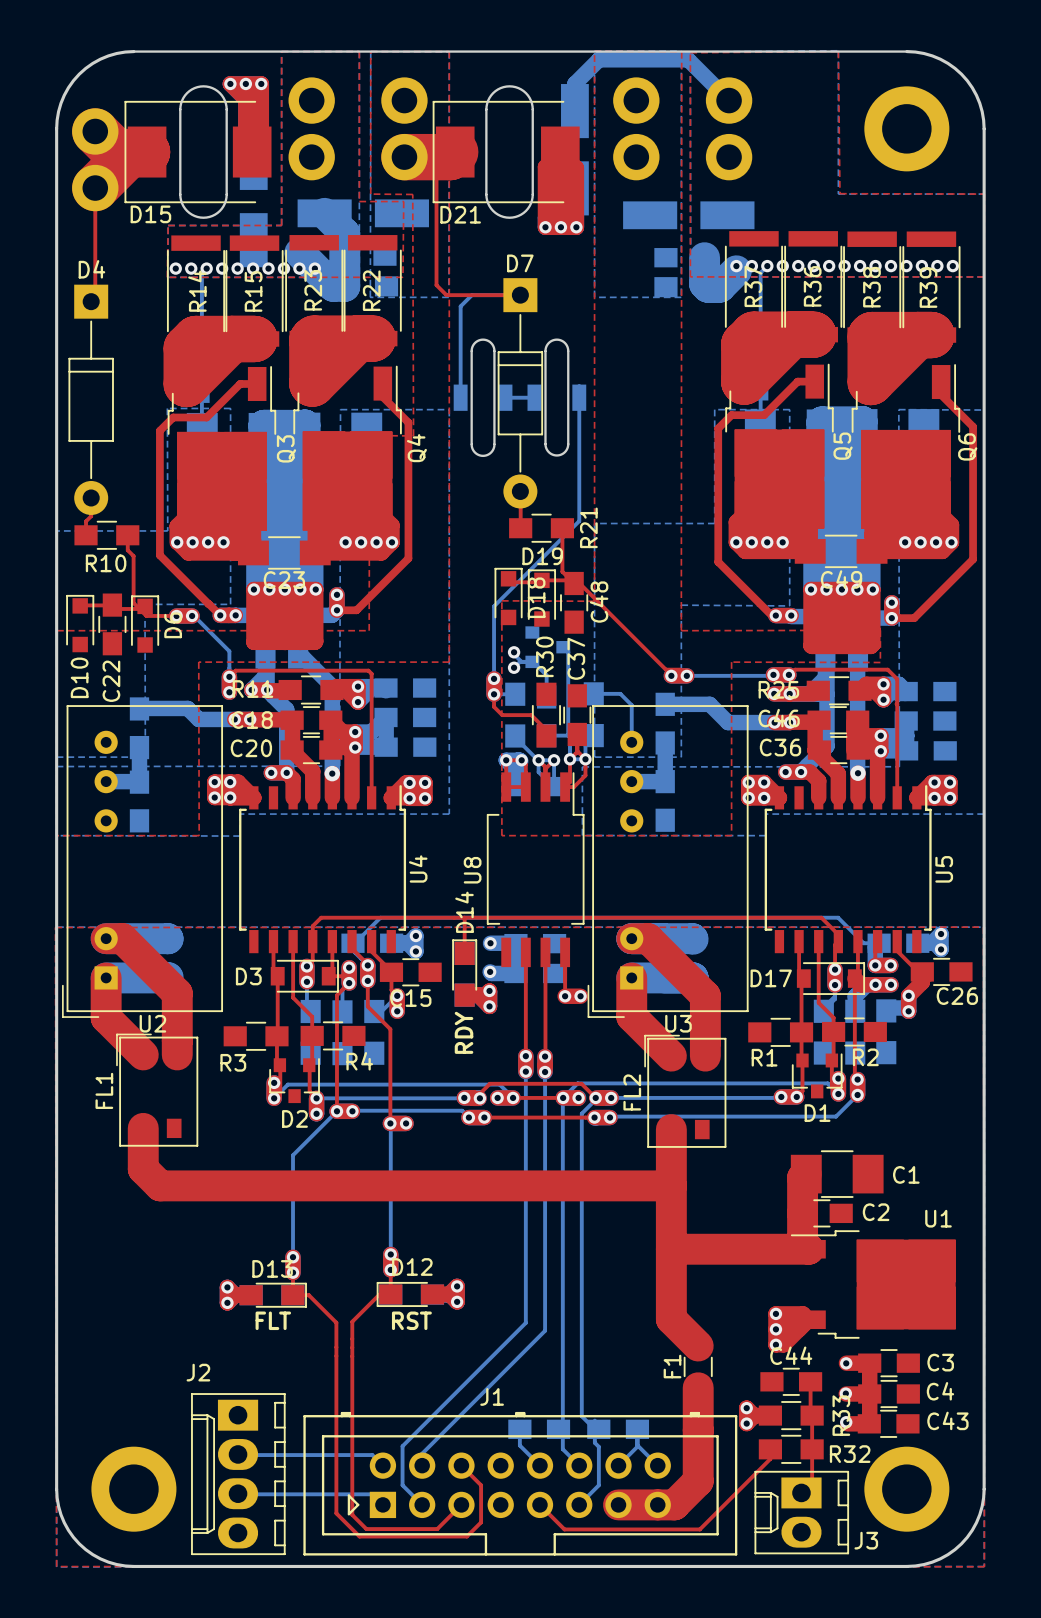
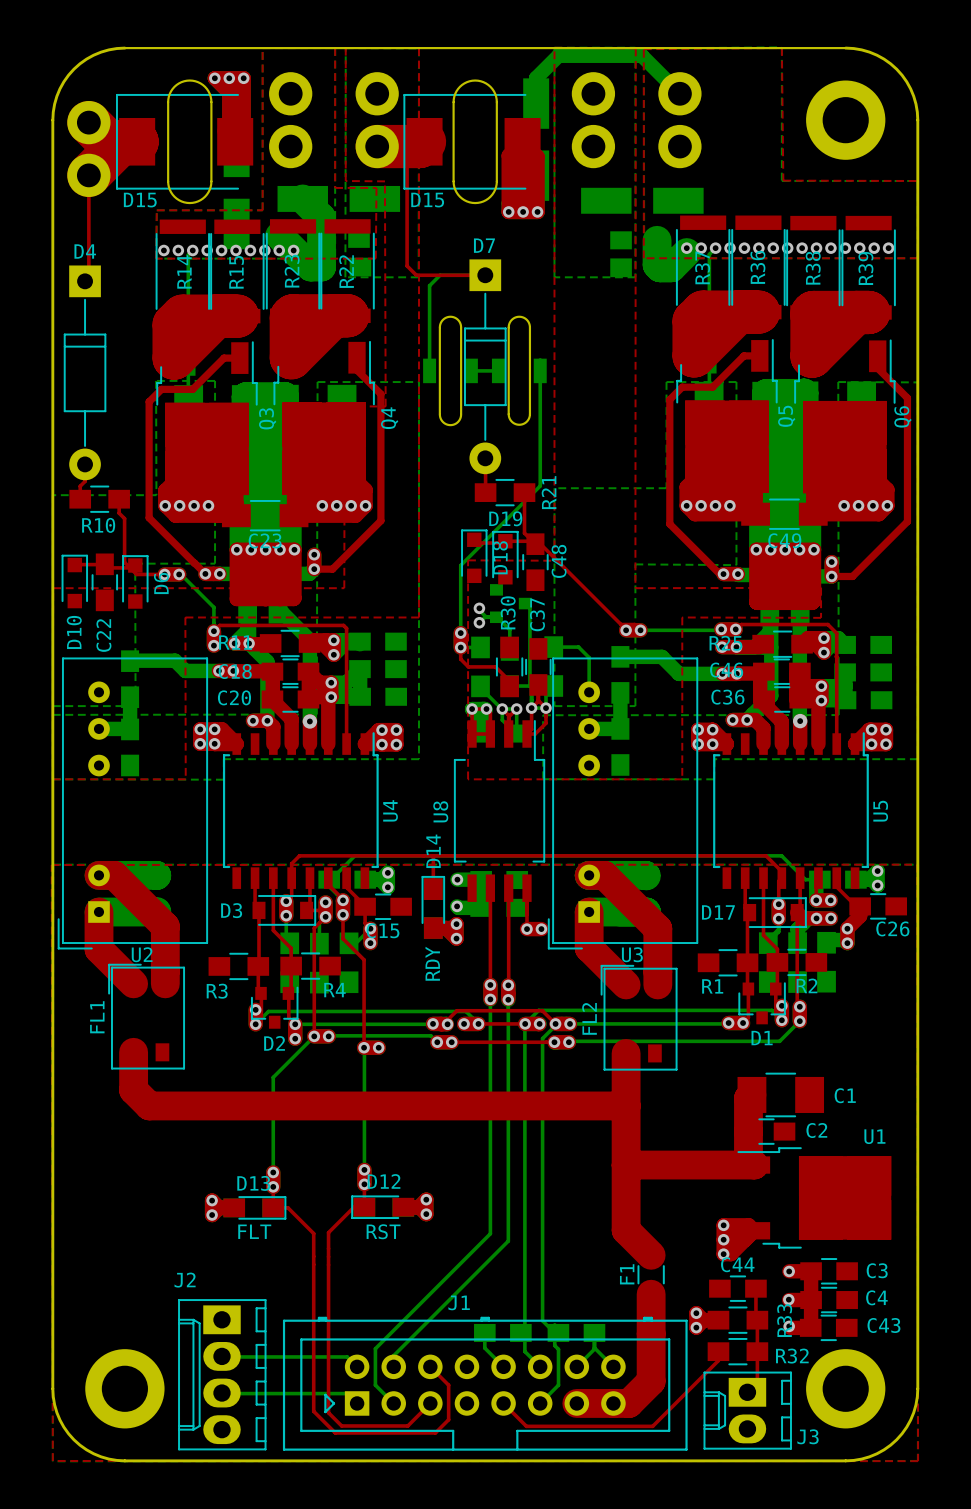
D21 name: D21 (460, 214) -> D15 (427, 200)

